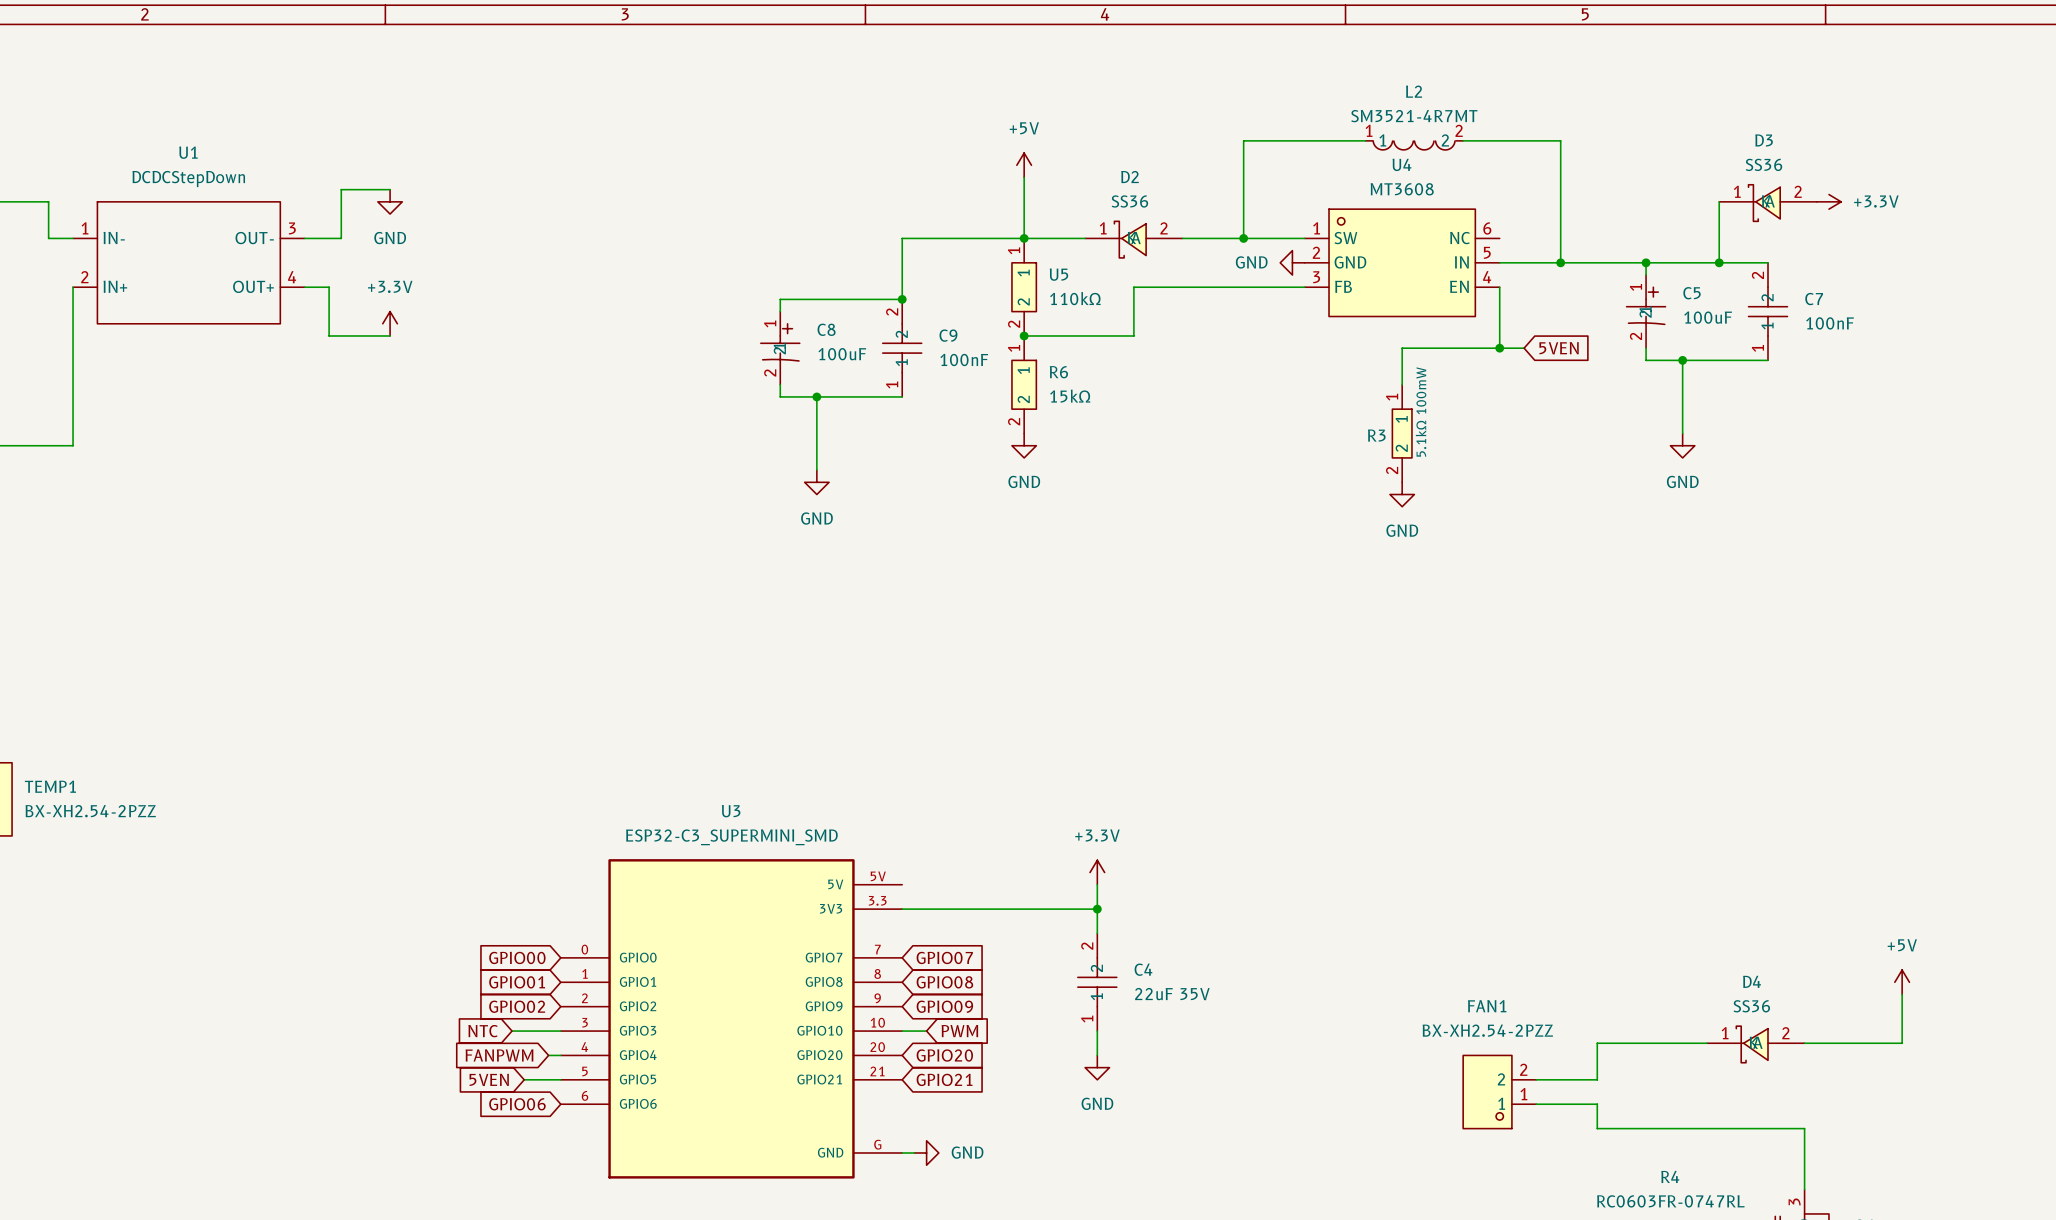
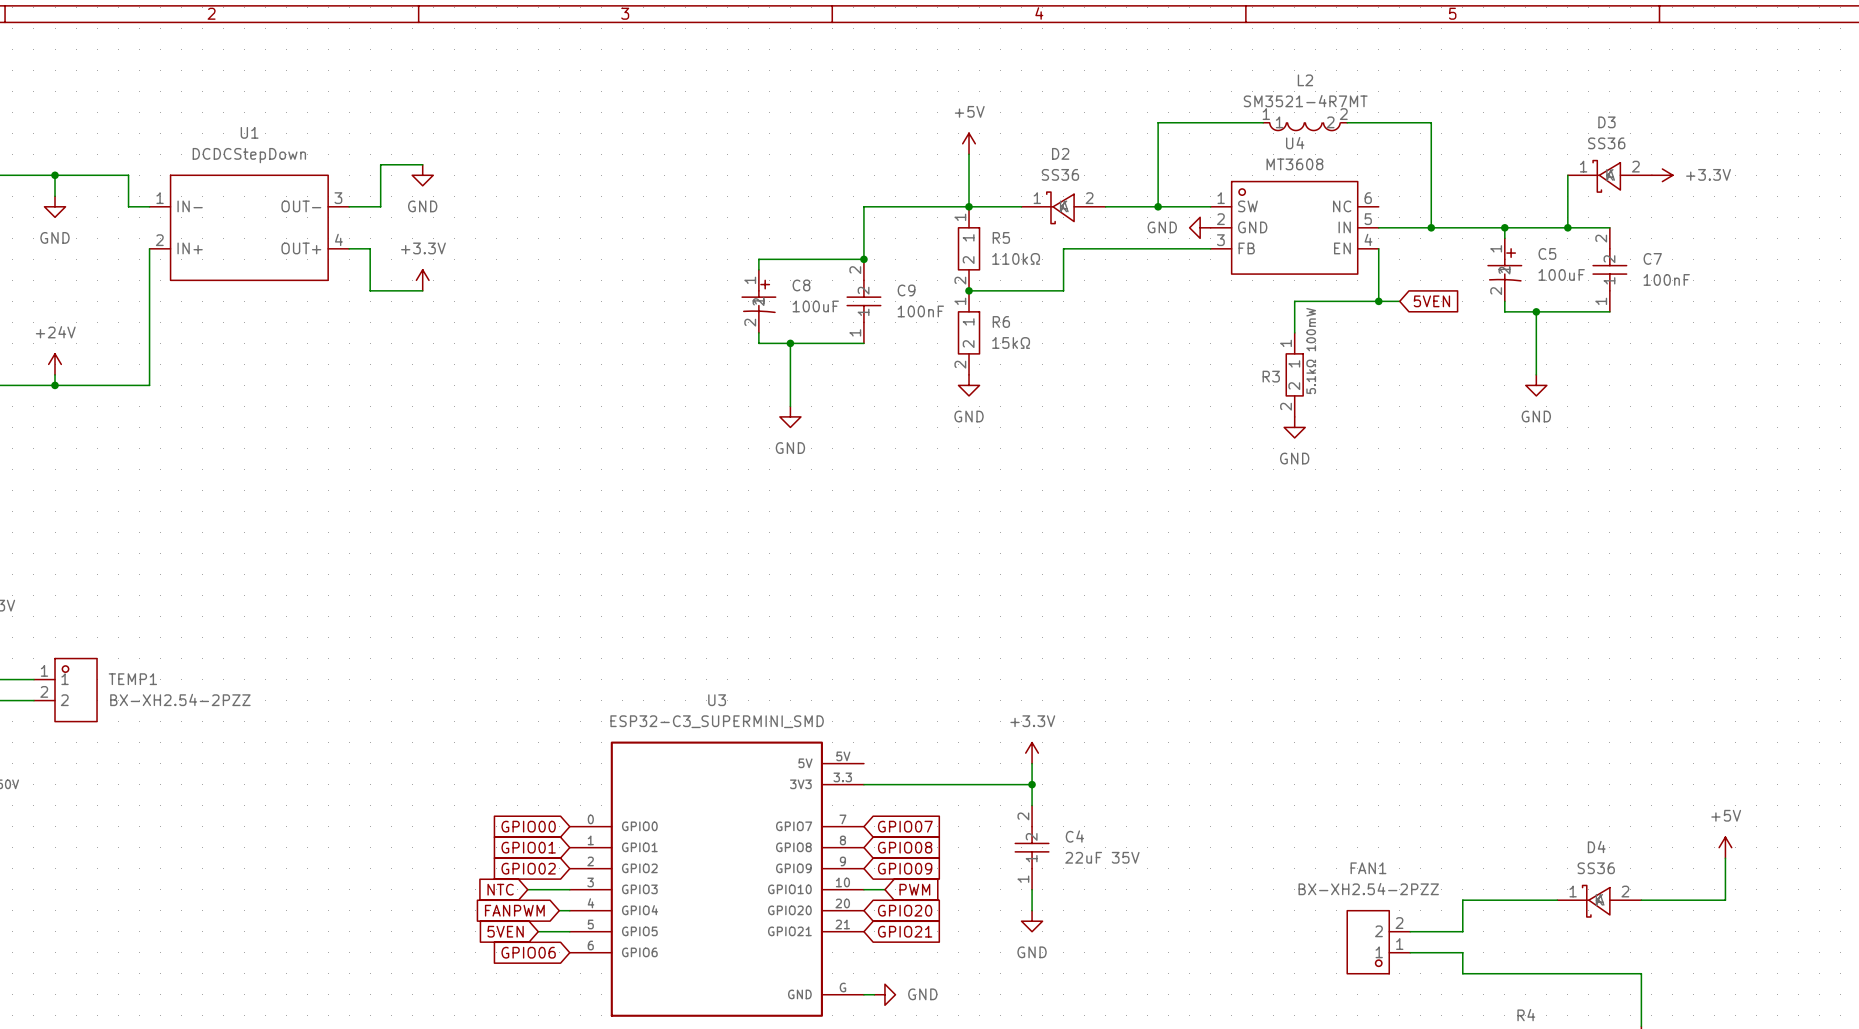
U5 name: U5 (1058, 274) -> R5 (1001, 237)

